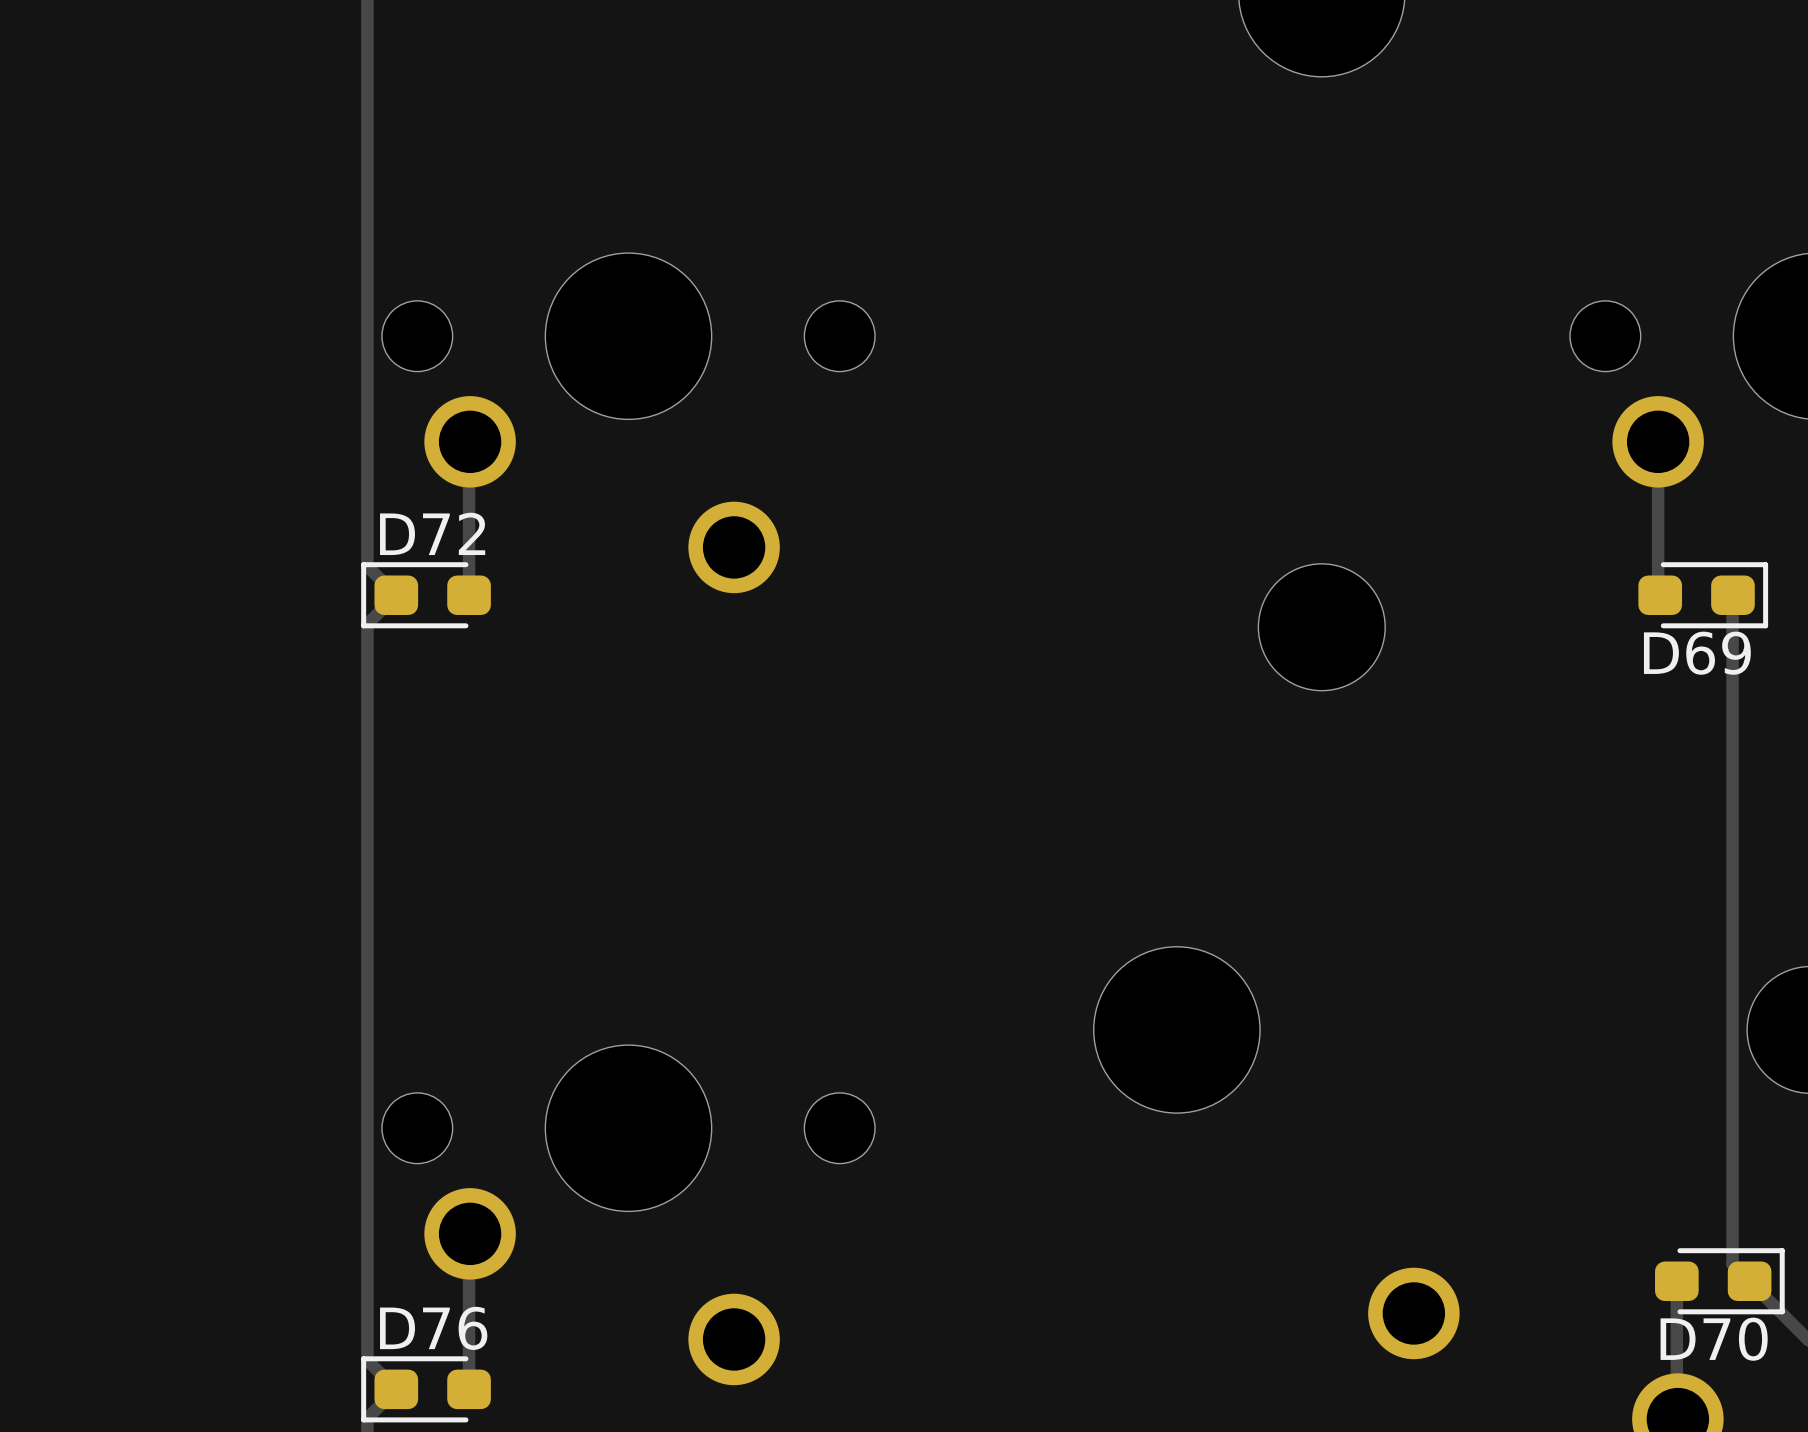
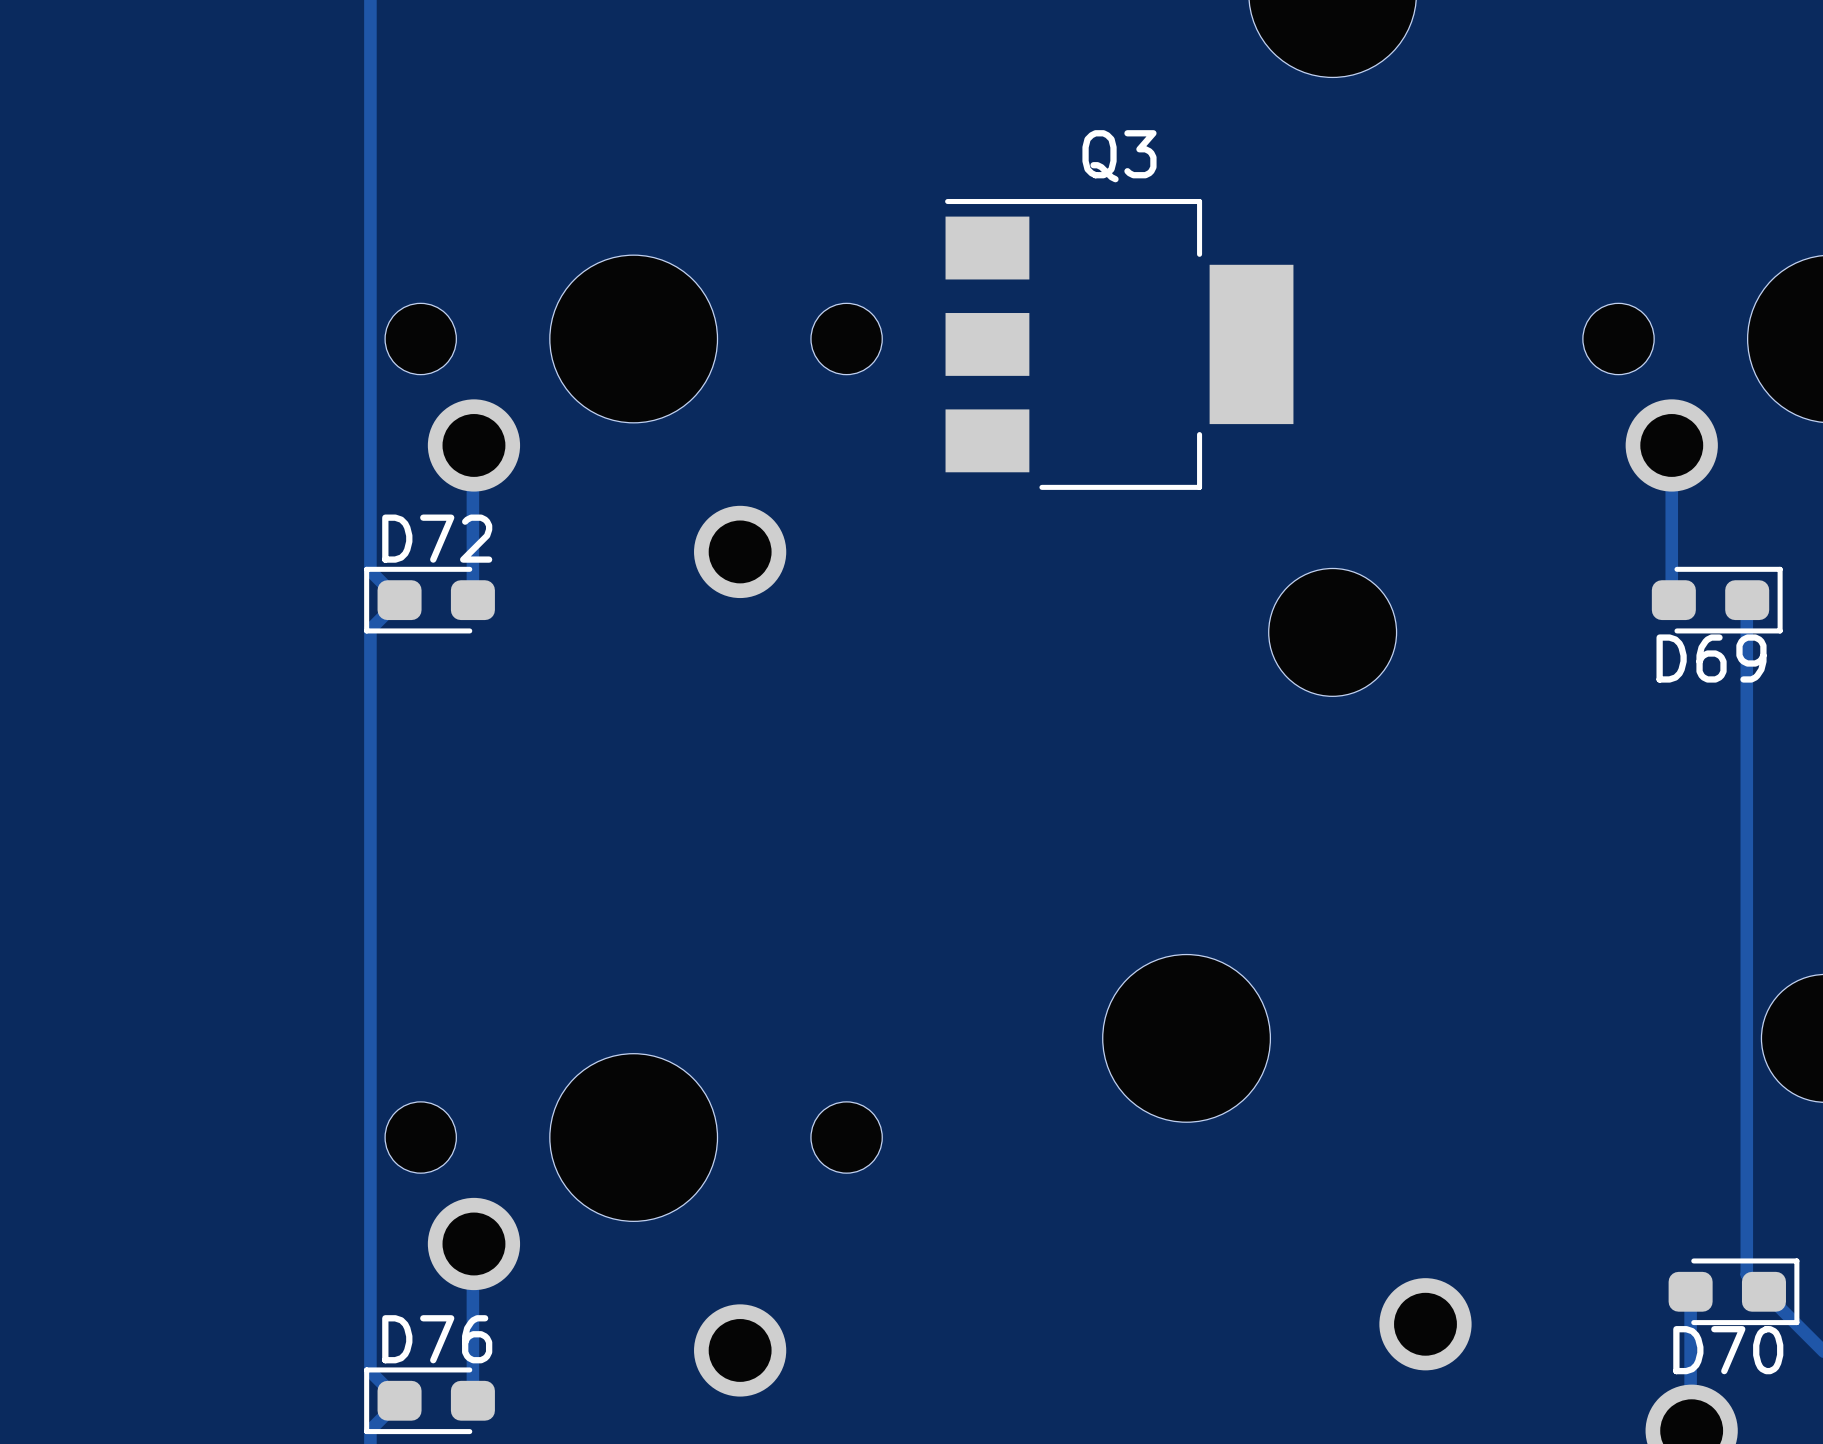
Q3: none -> (1119, 344)

